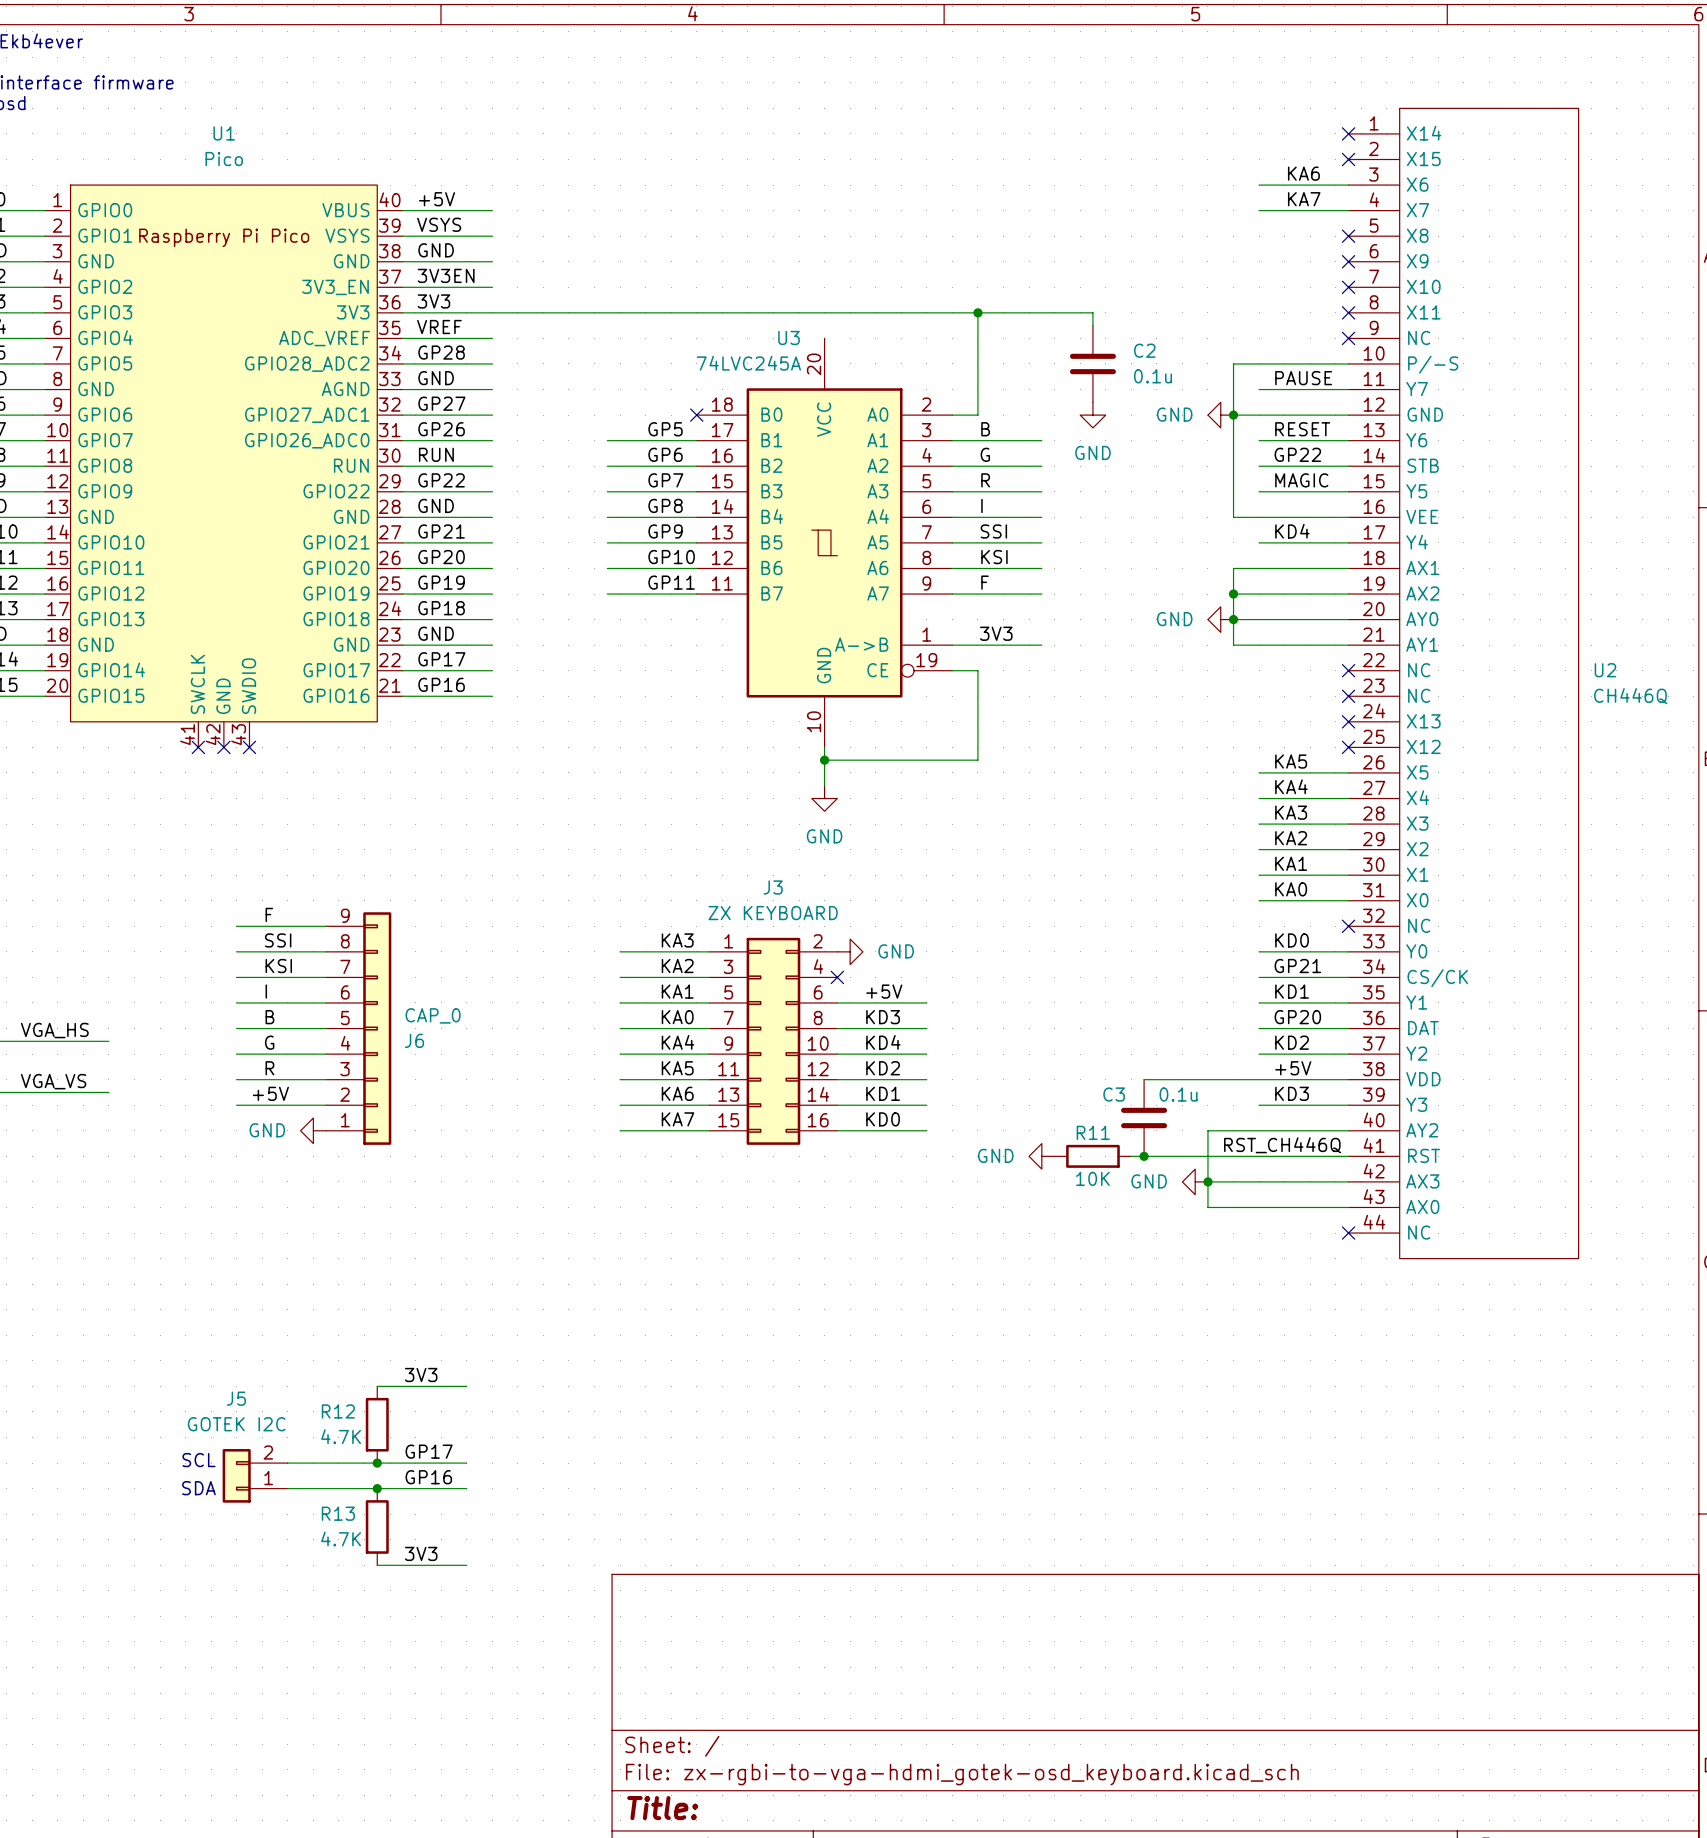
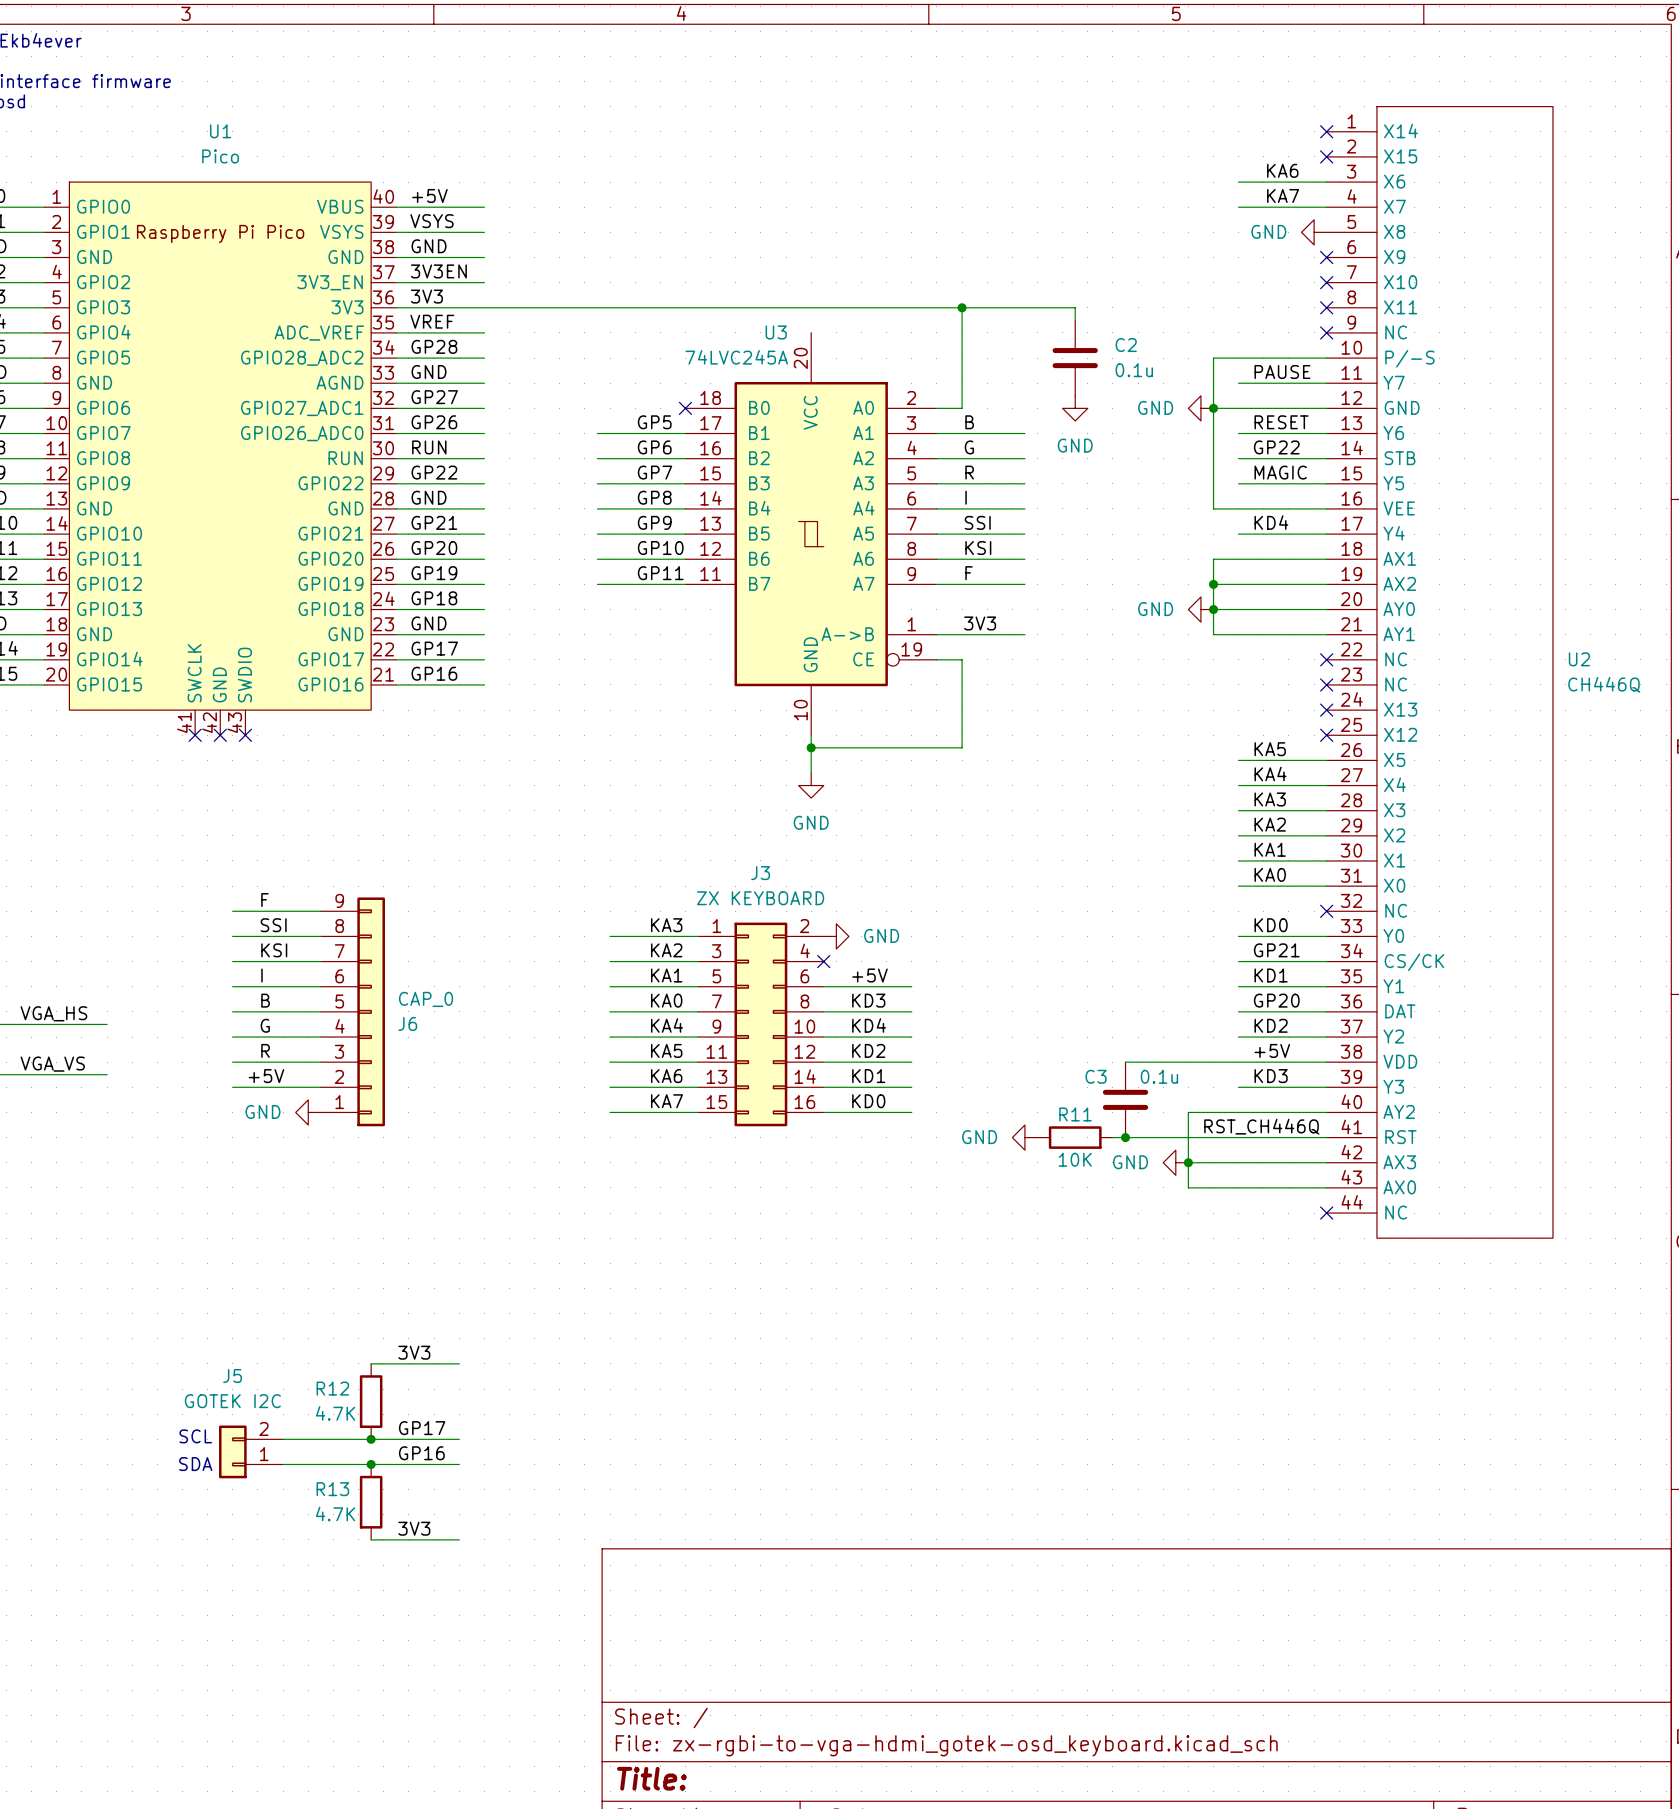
power symbol: none -> GND (1314, 232)
no-connect mark: (1348, 236) -> none

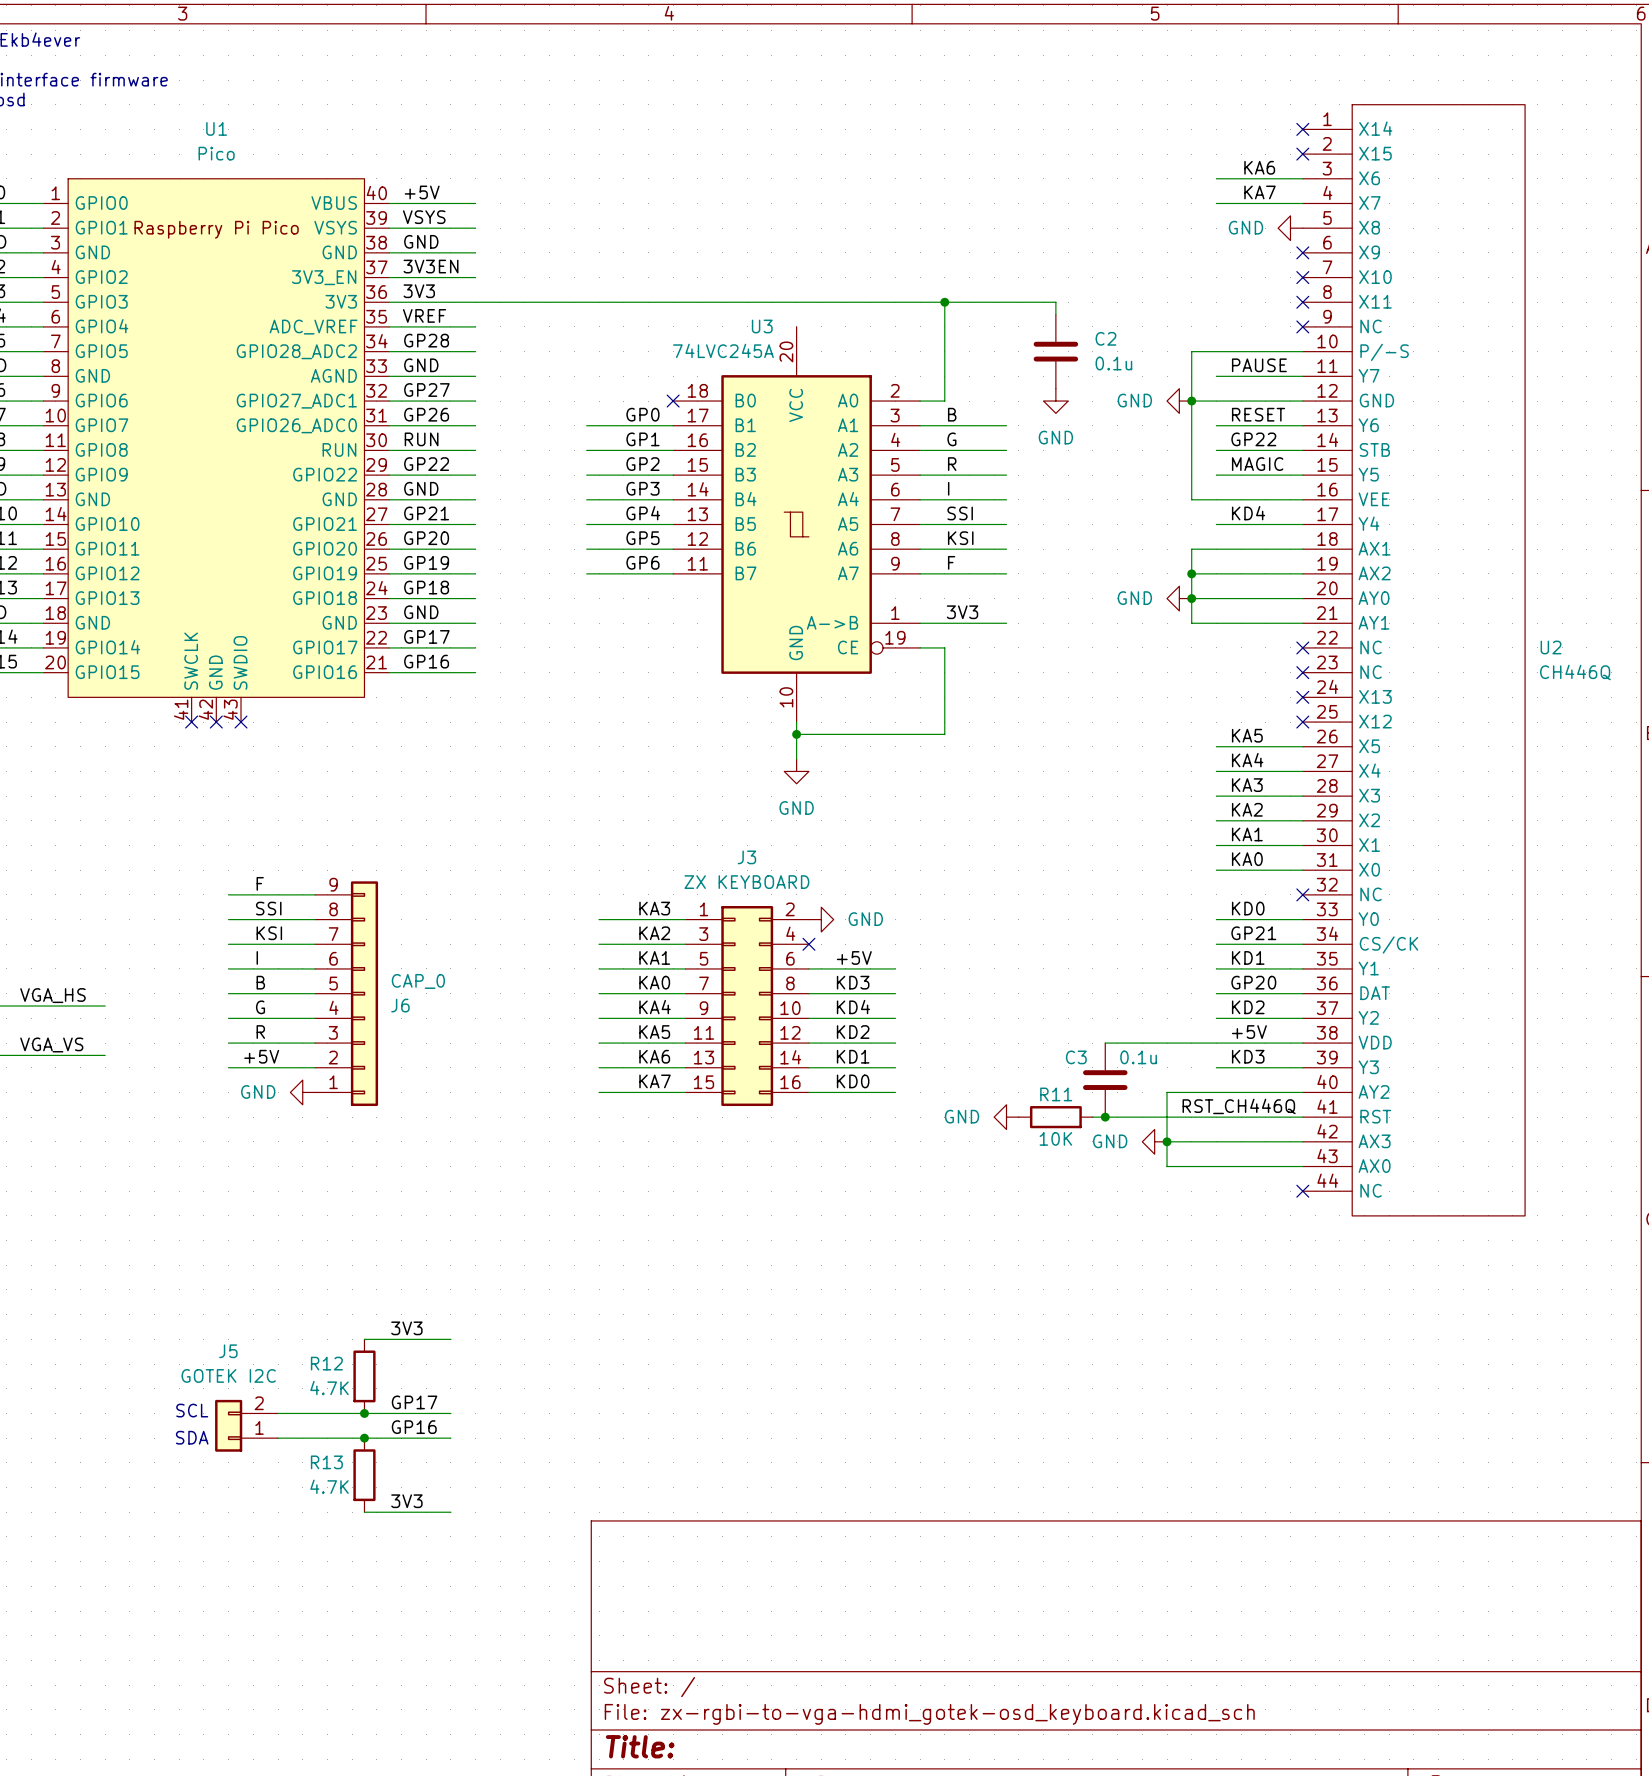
label: GP5 (654, 422) -> GP0 (642, 414)
label: GP6 (654, 447) -> GP1 (642, 439)
label: GP7 (655, 472) -> GP2 (642, 464)
label: GP8 (654, 497) -> GP3 (642, 488)
label: GP9 (654, 522) -> GP4 (643, 513)
label: GP10 (660, 548) -> GP5 (642, 538)
label: GP11 (660, 573) -> GP6 (642, 562)

